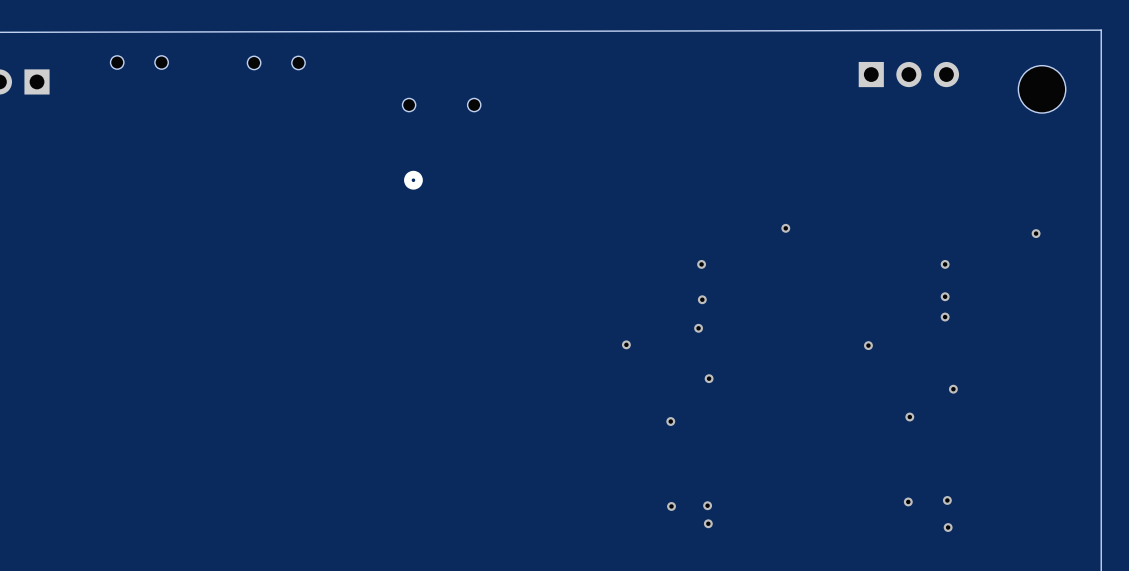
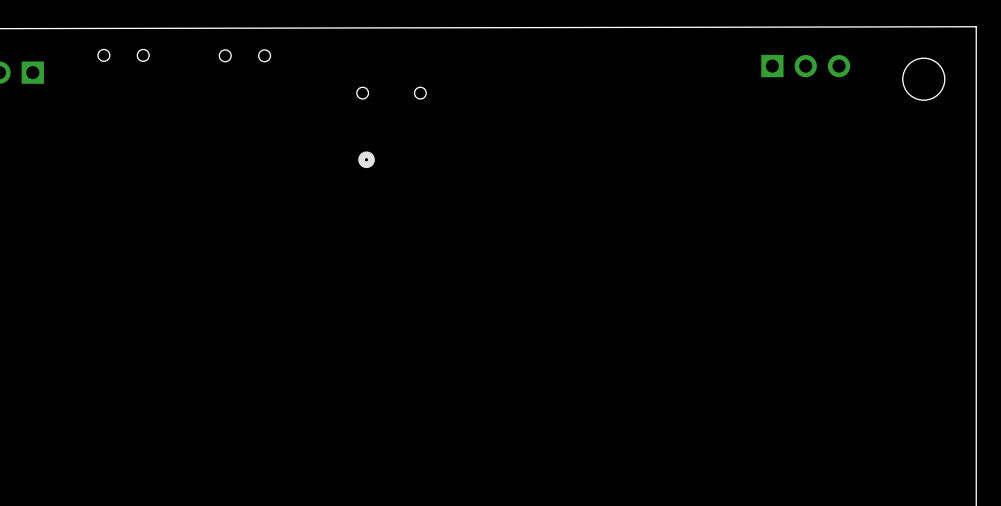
via: (785, 228) -> none
via: (1036, 233) -> none
via: (701, 264) -> none
via: (945, 264) -> none
via: (945, 296) -> none
via: (702, 299) -> none
via: (945, 317) -> none
via: (698, 328) -> none
via: (626, 344) -> none
via: (868, 345) -> none
via: (709, 378) -> none
via: (953, 389) -> none
via: (909, 417) -> none
via: (670, 421) -> none
via: (947, 500) -> none
via: (908, 501) -> none
via: (707, 505) -> none
via: (671, 506) -> none
via: (708, 523) -> none
via: (948, 527) -> none

